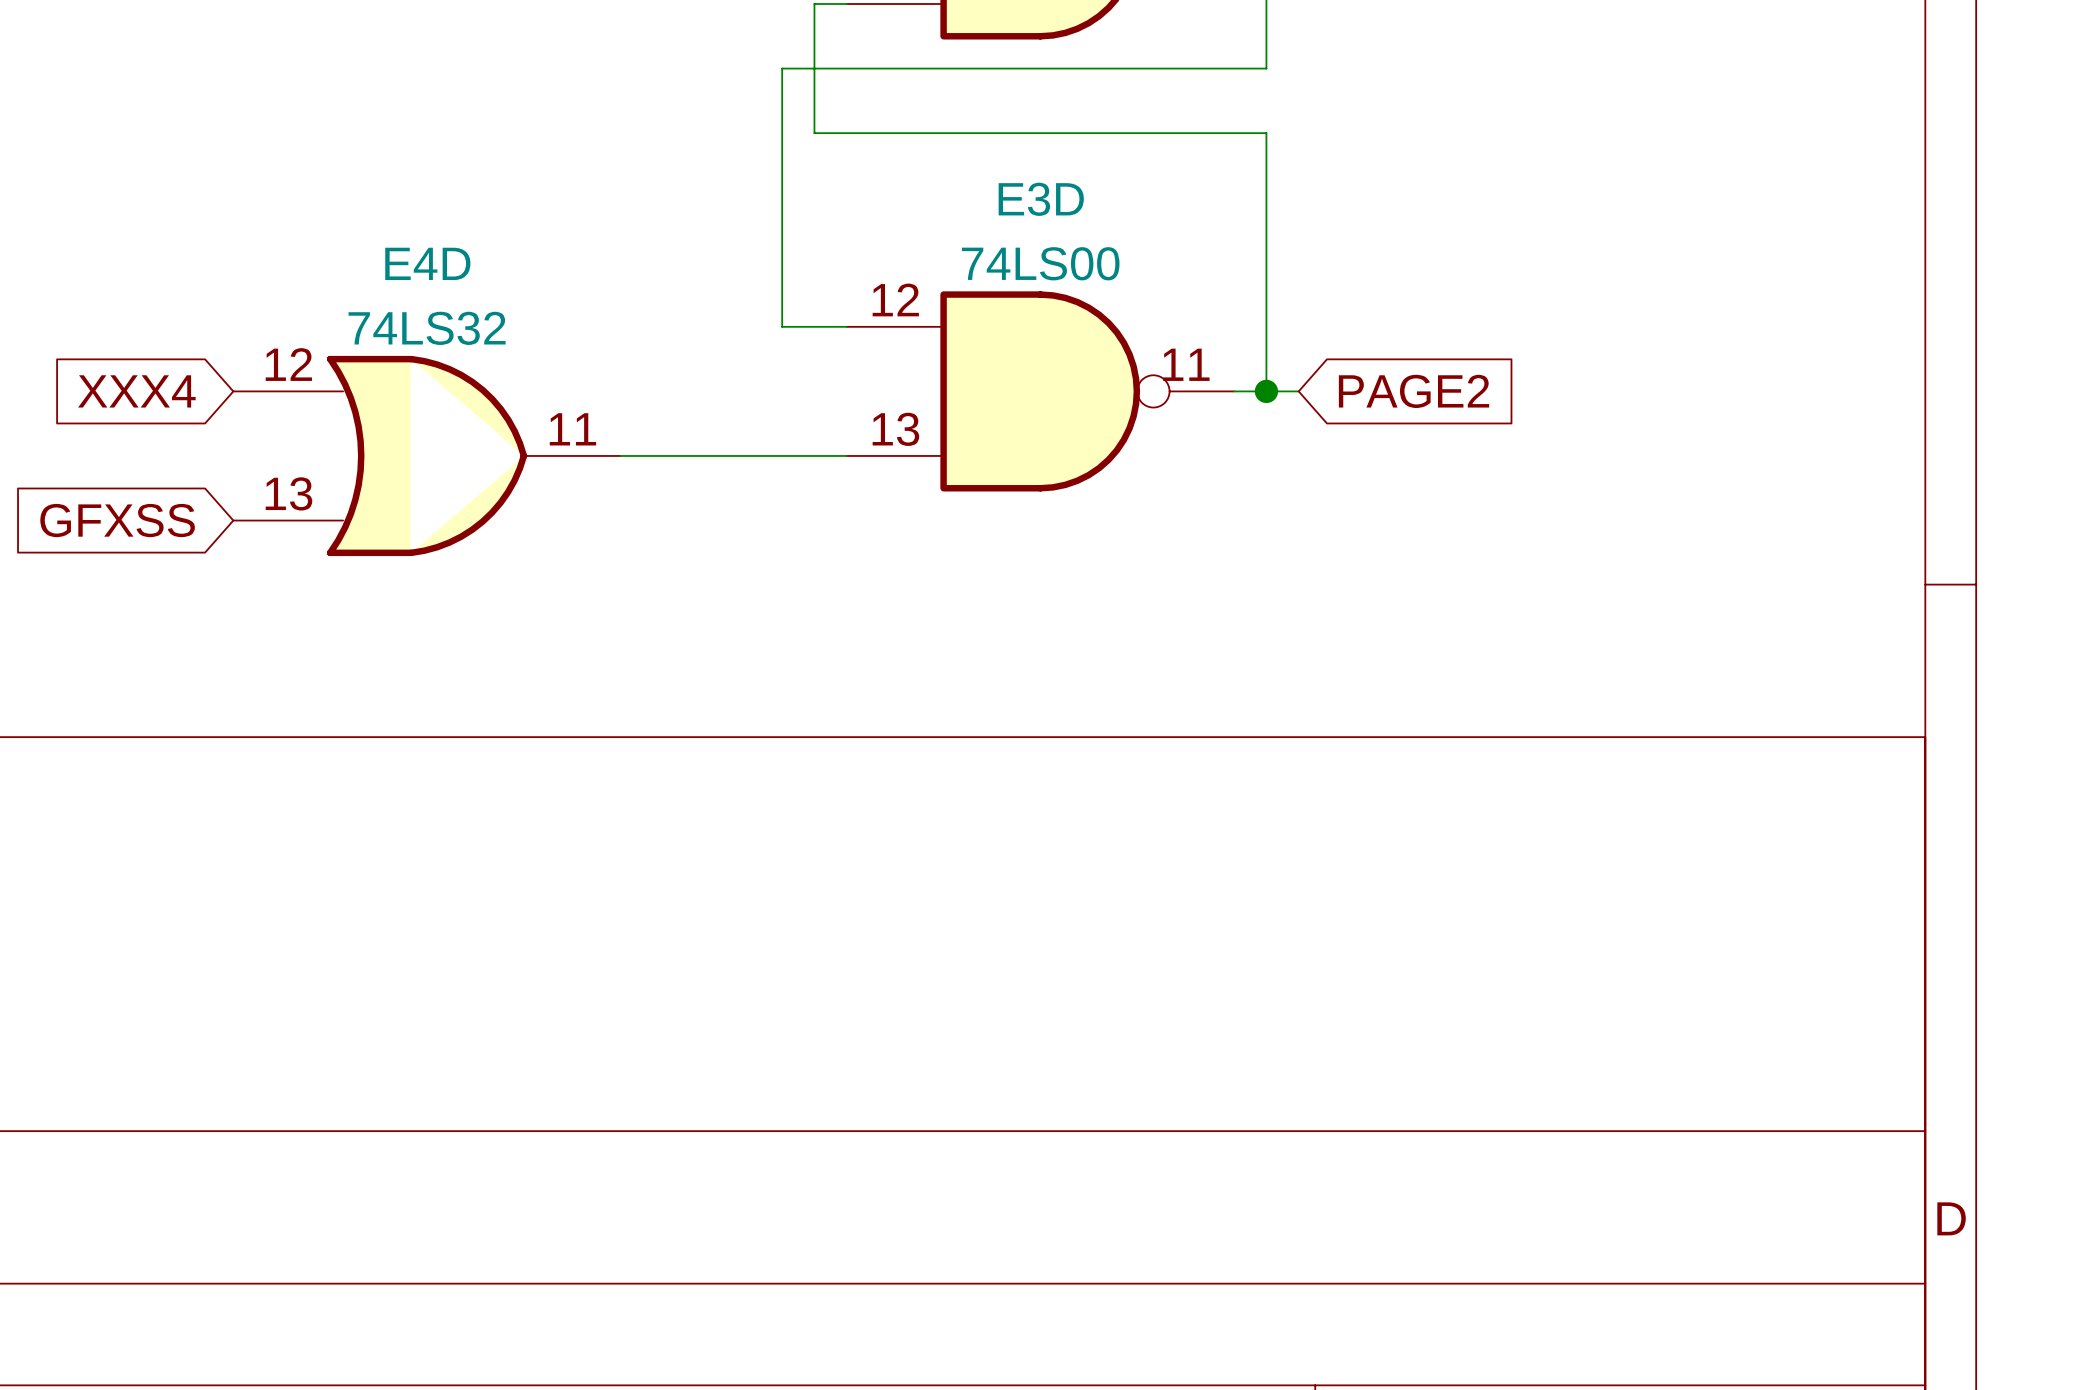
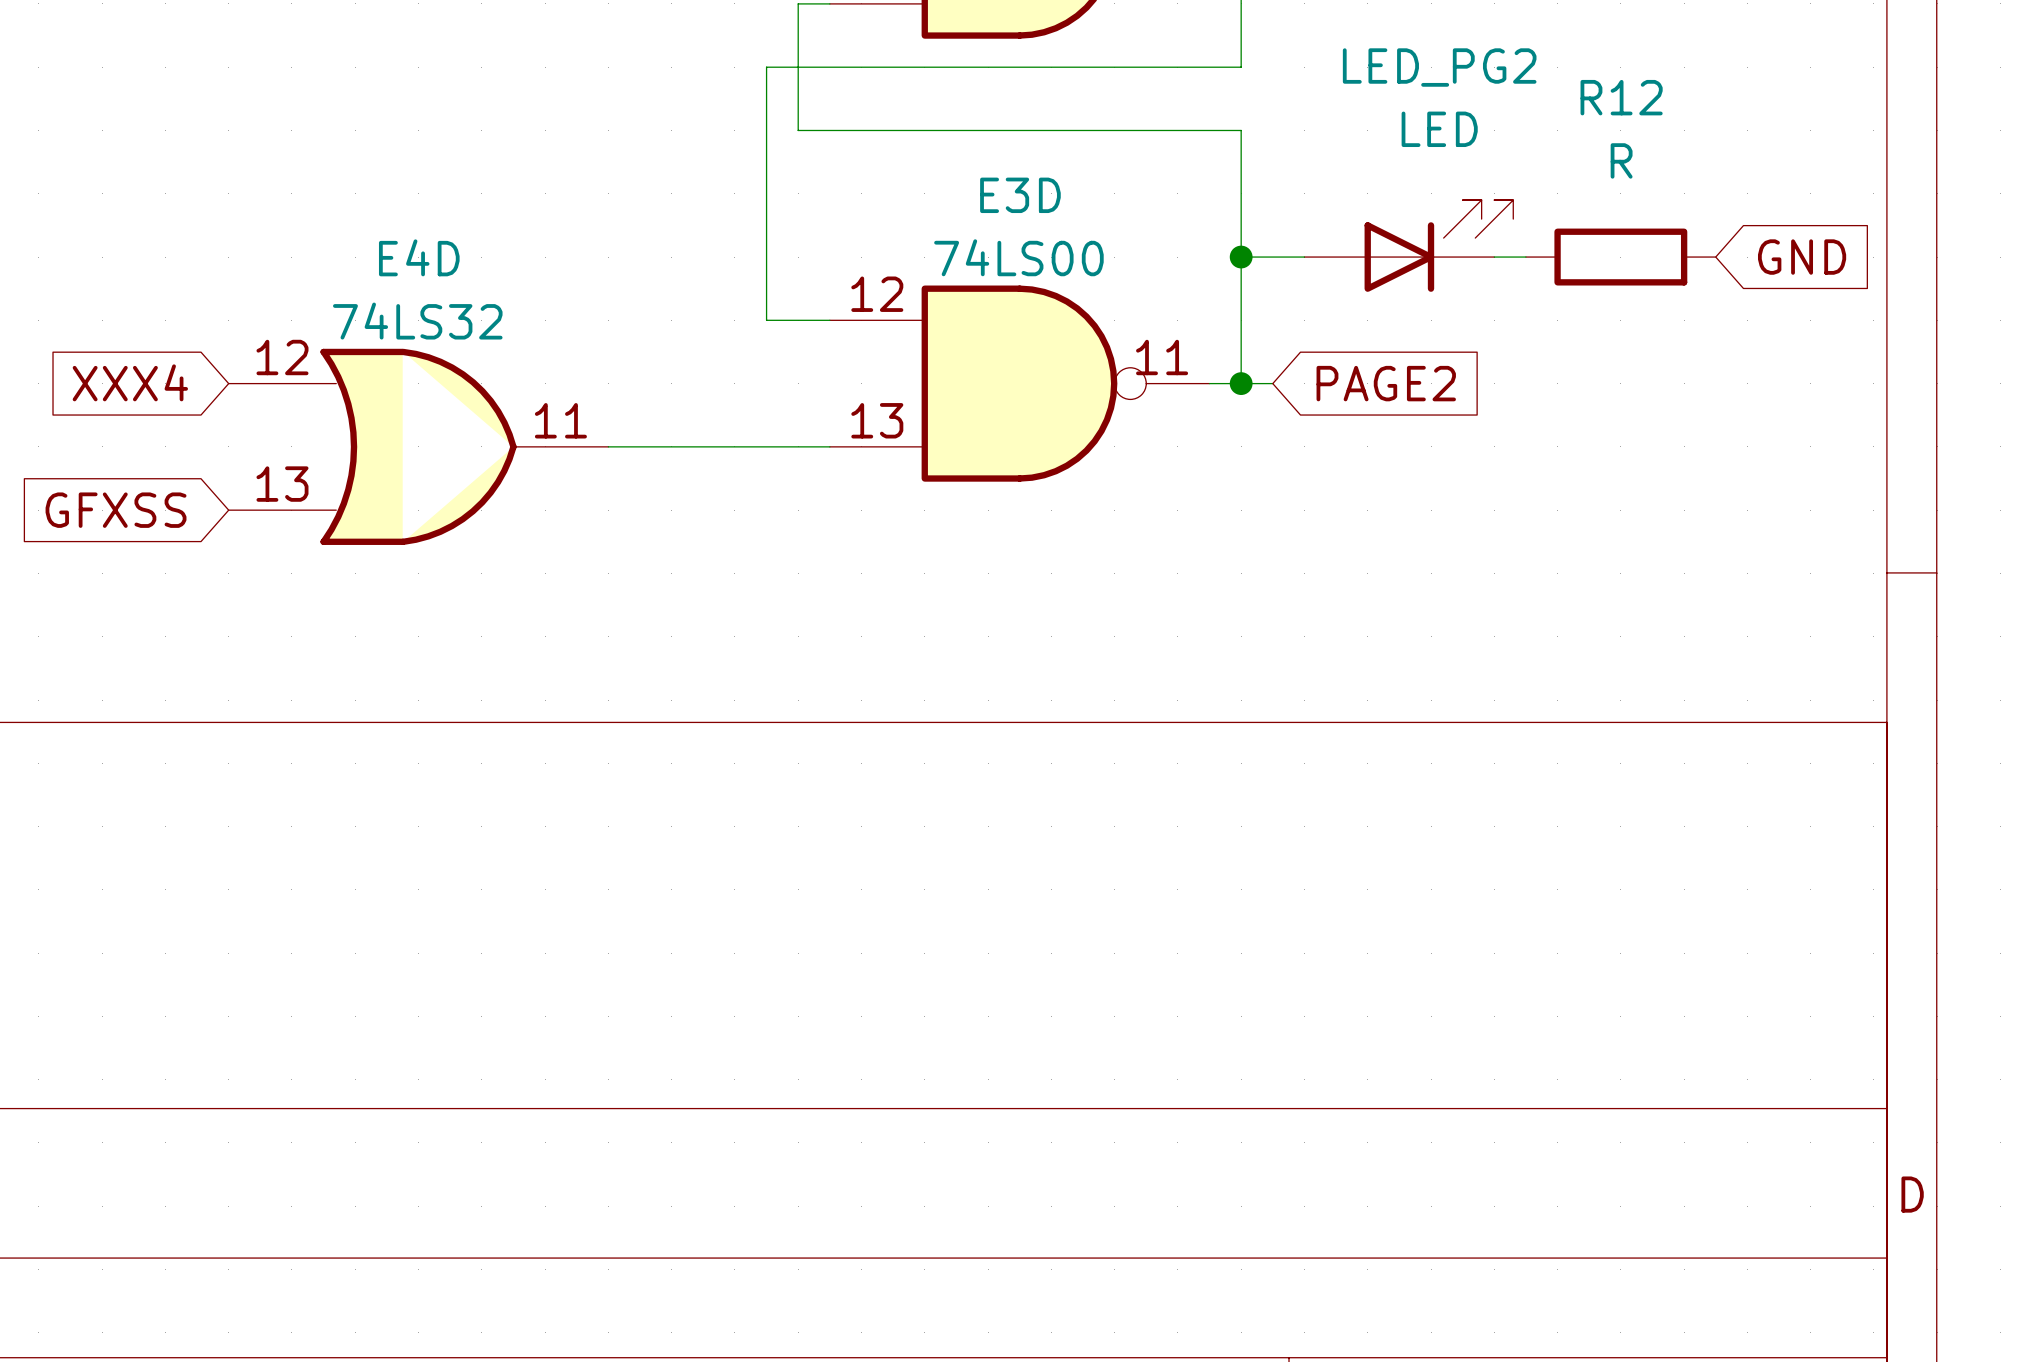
LED_PG2: none -> LED (1408, 245)
wire: none -> (1241, 257) (1304, 257)
junction: none -> (1241, 257)
wire: none -> (1494, 257) (1525, 257)
R12: none -> R (1620, 257)
global label: none -> GND (1802, 257)

